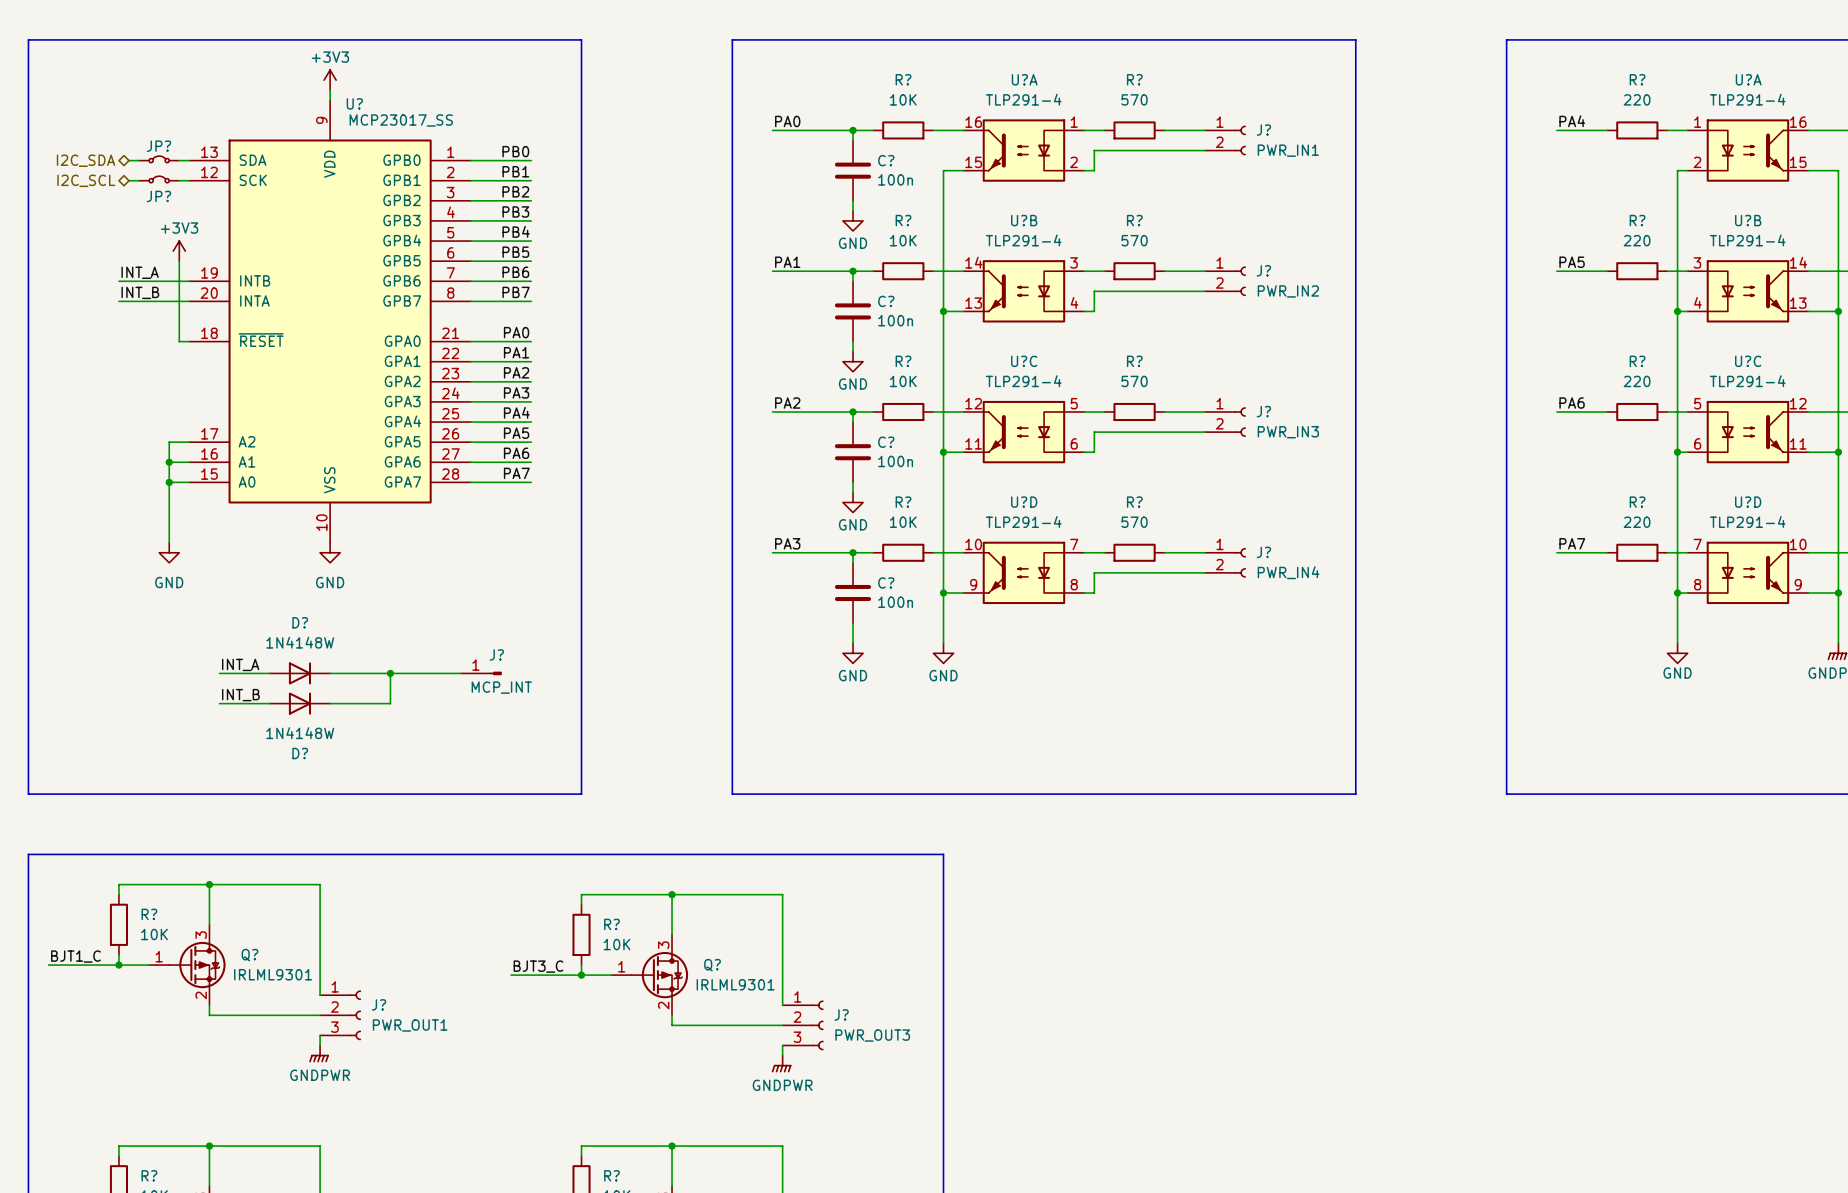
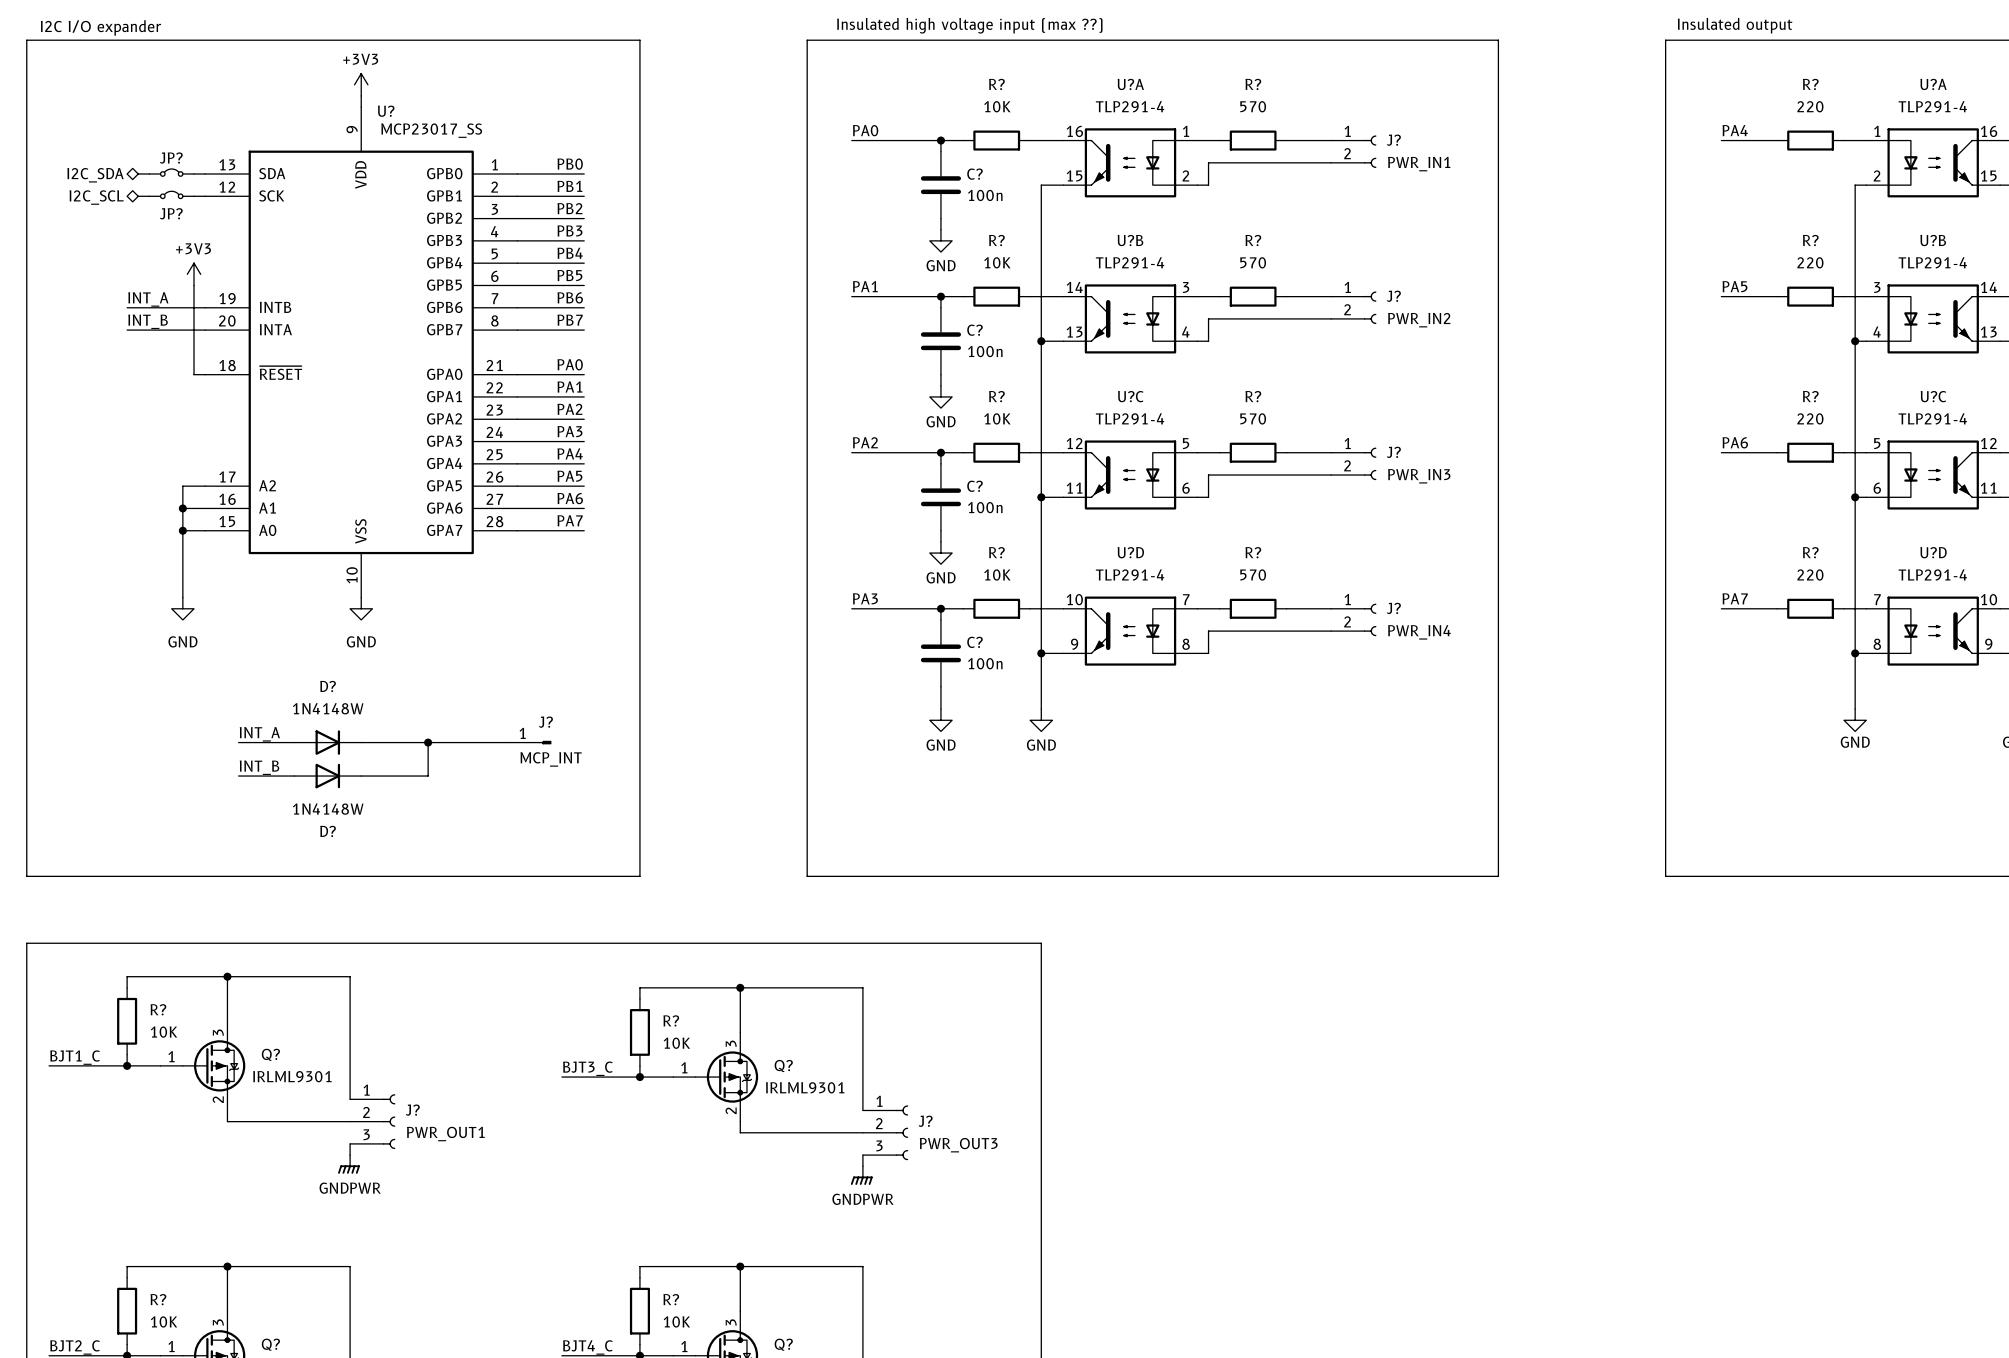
text: none -> Insulated high voltage input (max ??) (969, 25)
text: none -> Insulated output (1735, 25)
text: none -> I2C I/O expander (100, 27)

